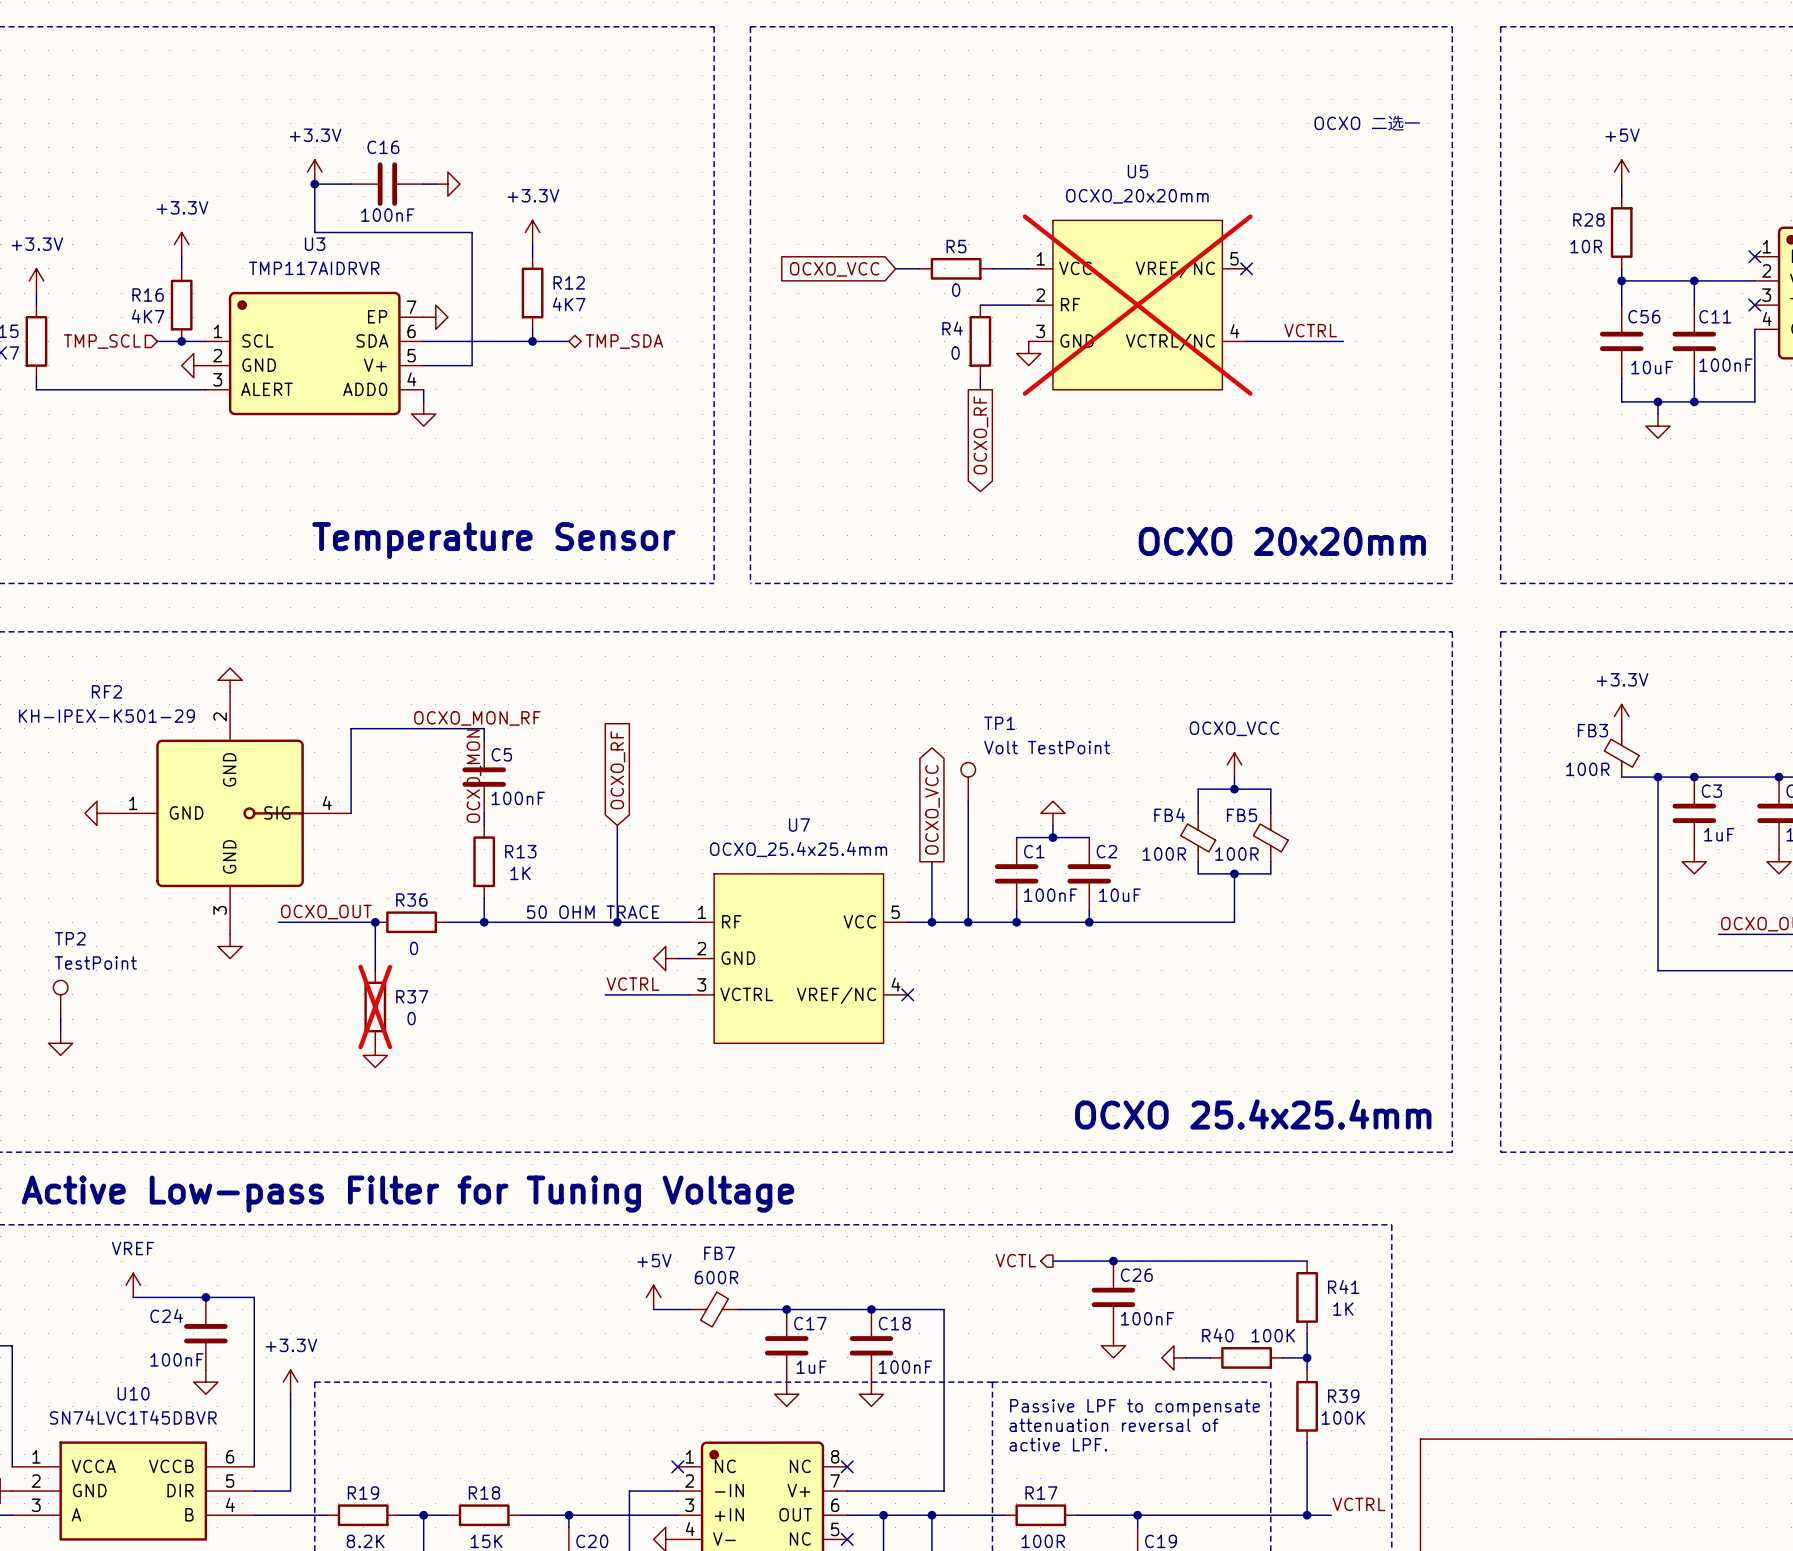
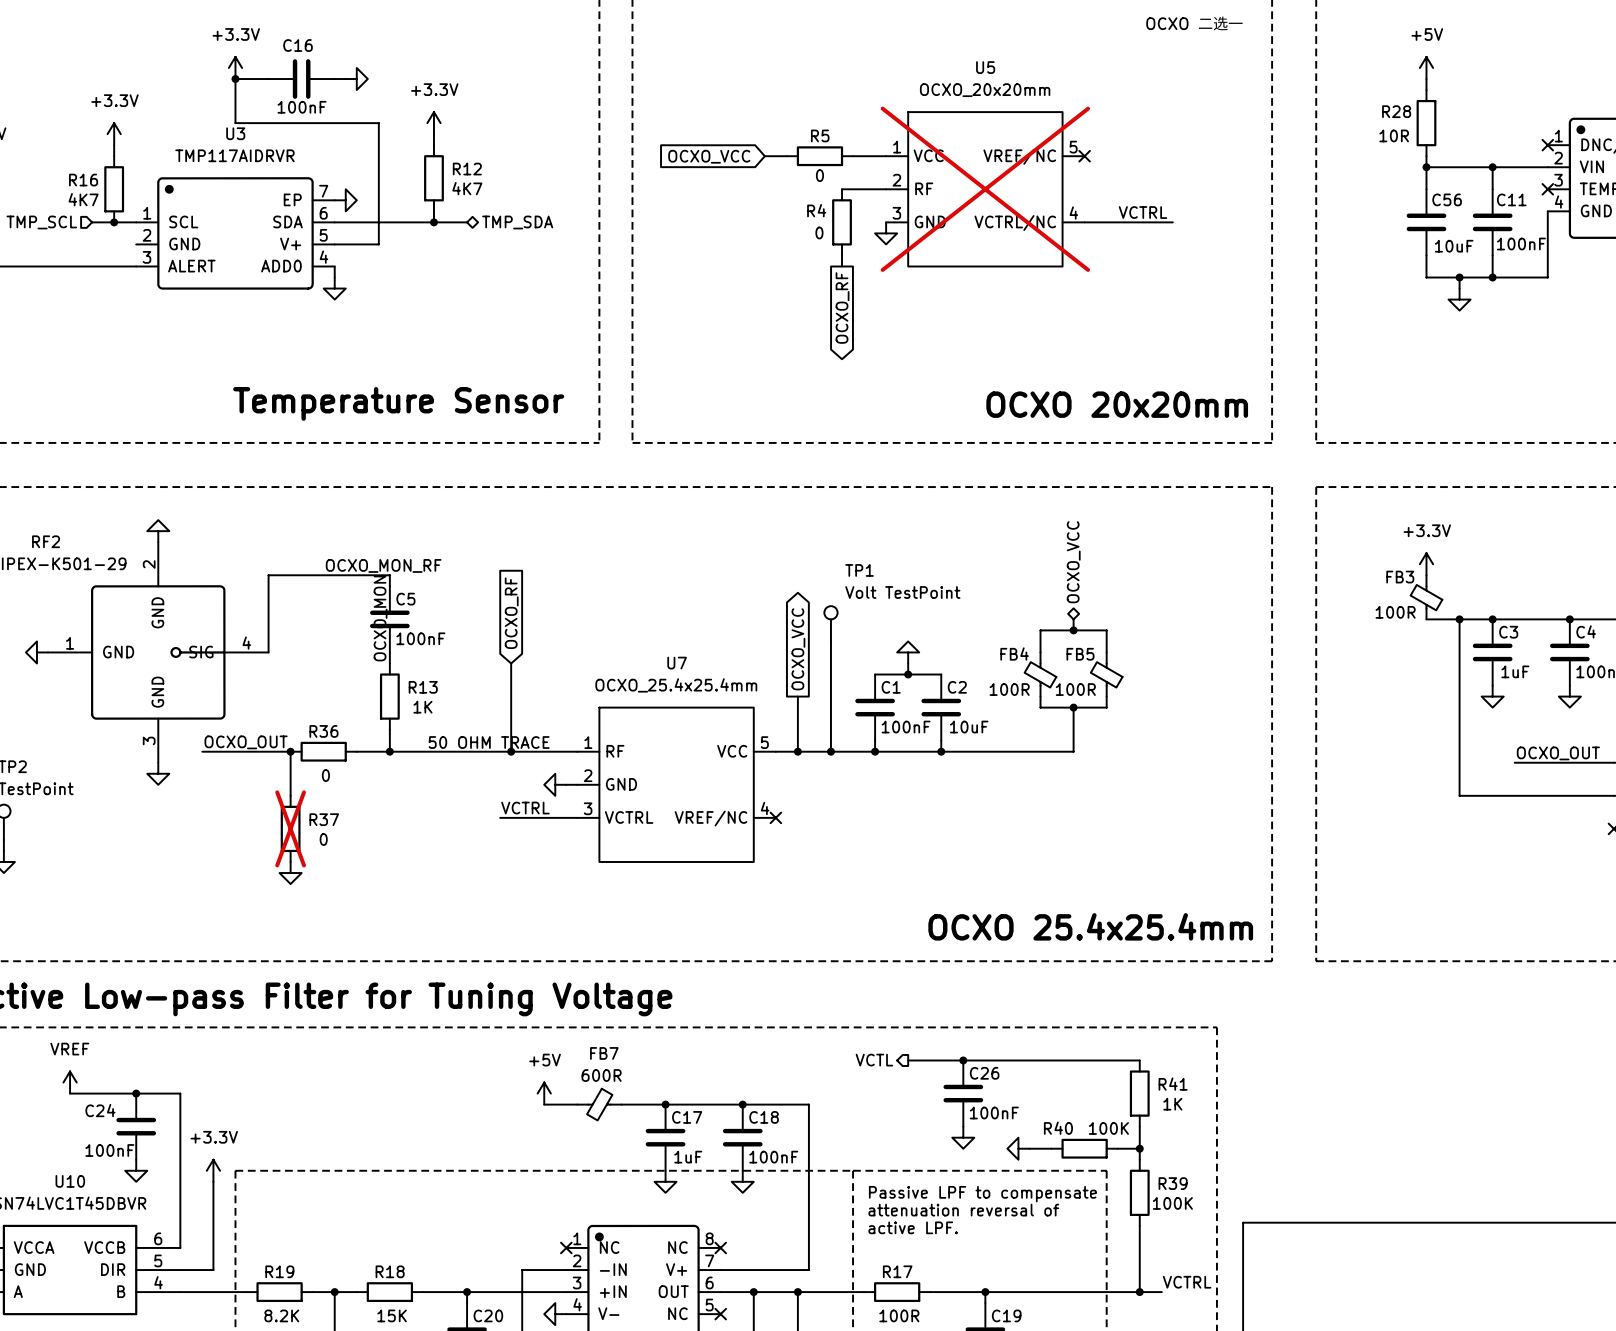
power symbol: (193, 365) -> none
hierarchical label: none -> OCXO_VCC (1073, 562)
power symbol: OCXO_VCC (1234, 764) -> none

